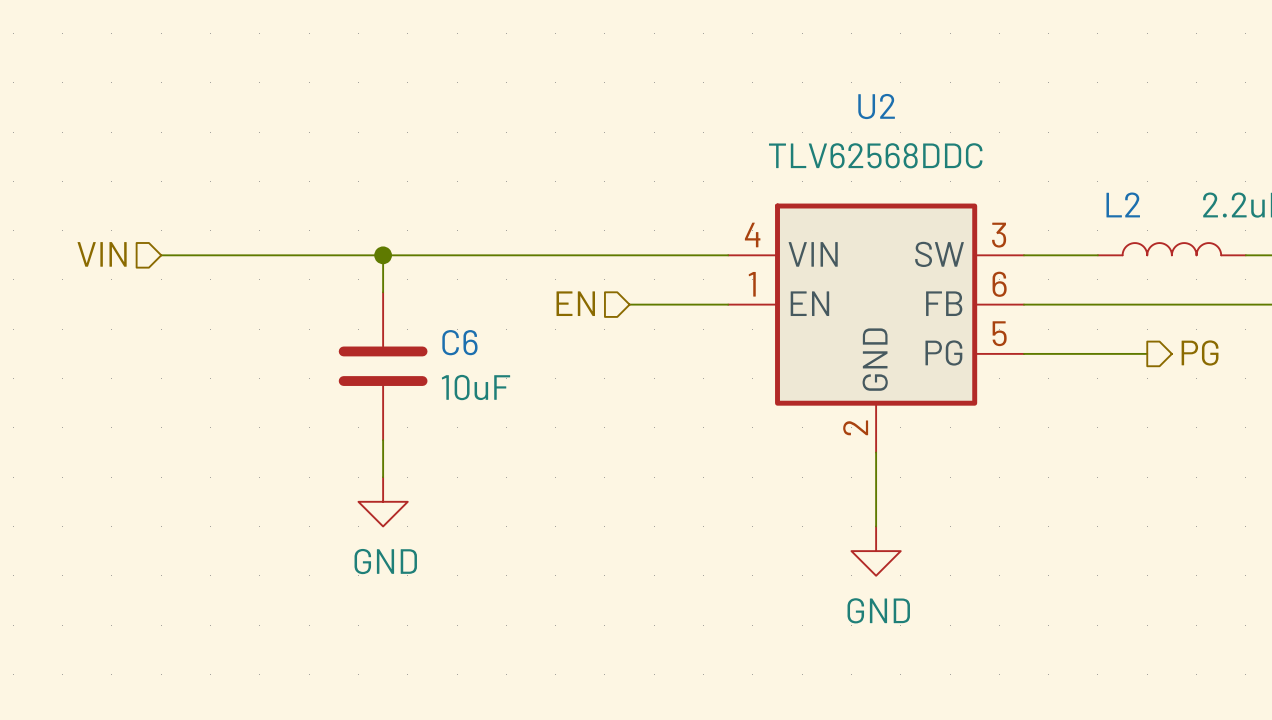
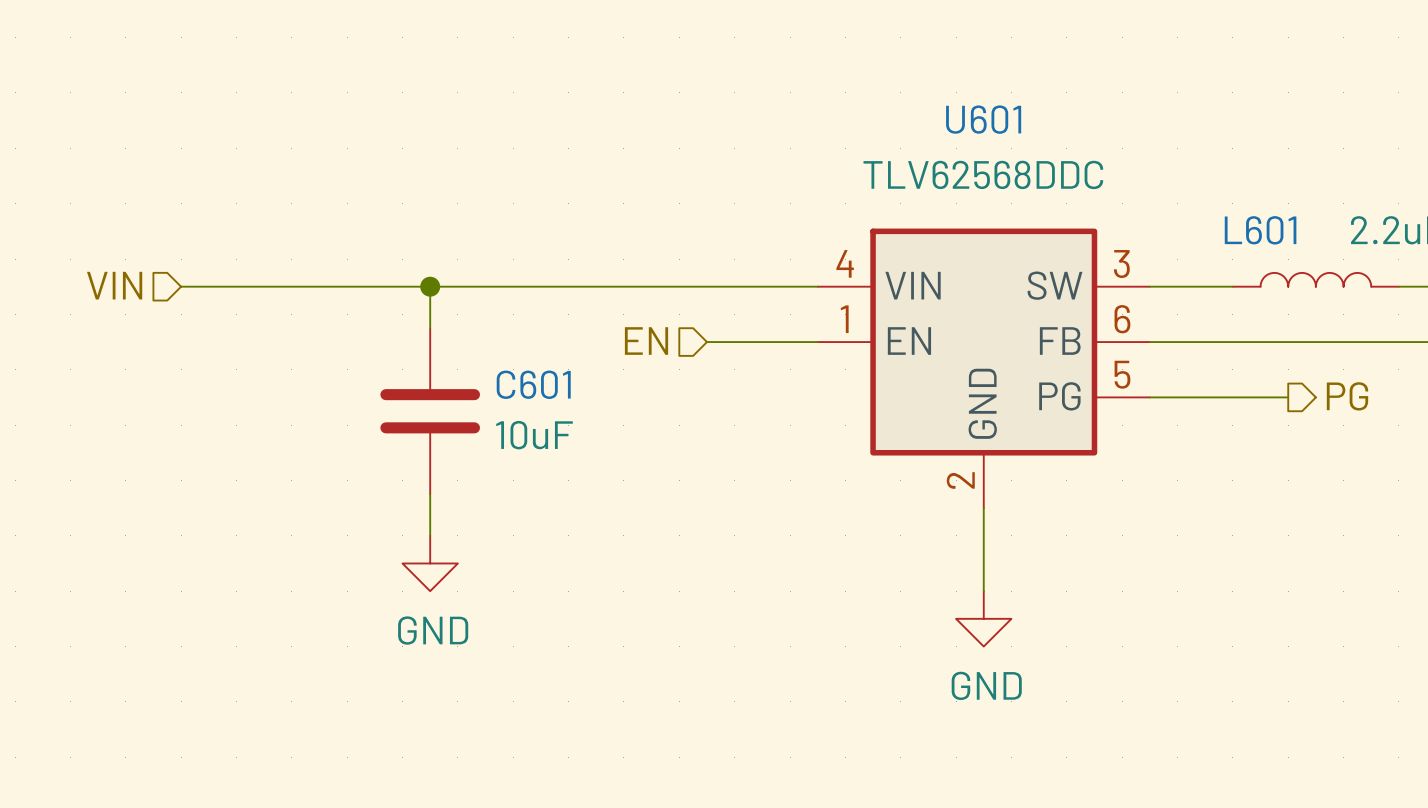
U2 name: U2 (876, 106) -> U601 (983, 119)
L2 name: L2 (1123, 204) -> L601 (1260, 230)
C6 name: C6 (459, 342) -> C601 (533, 384)

